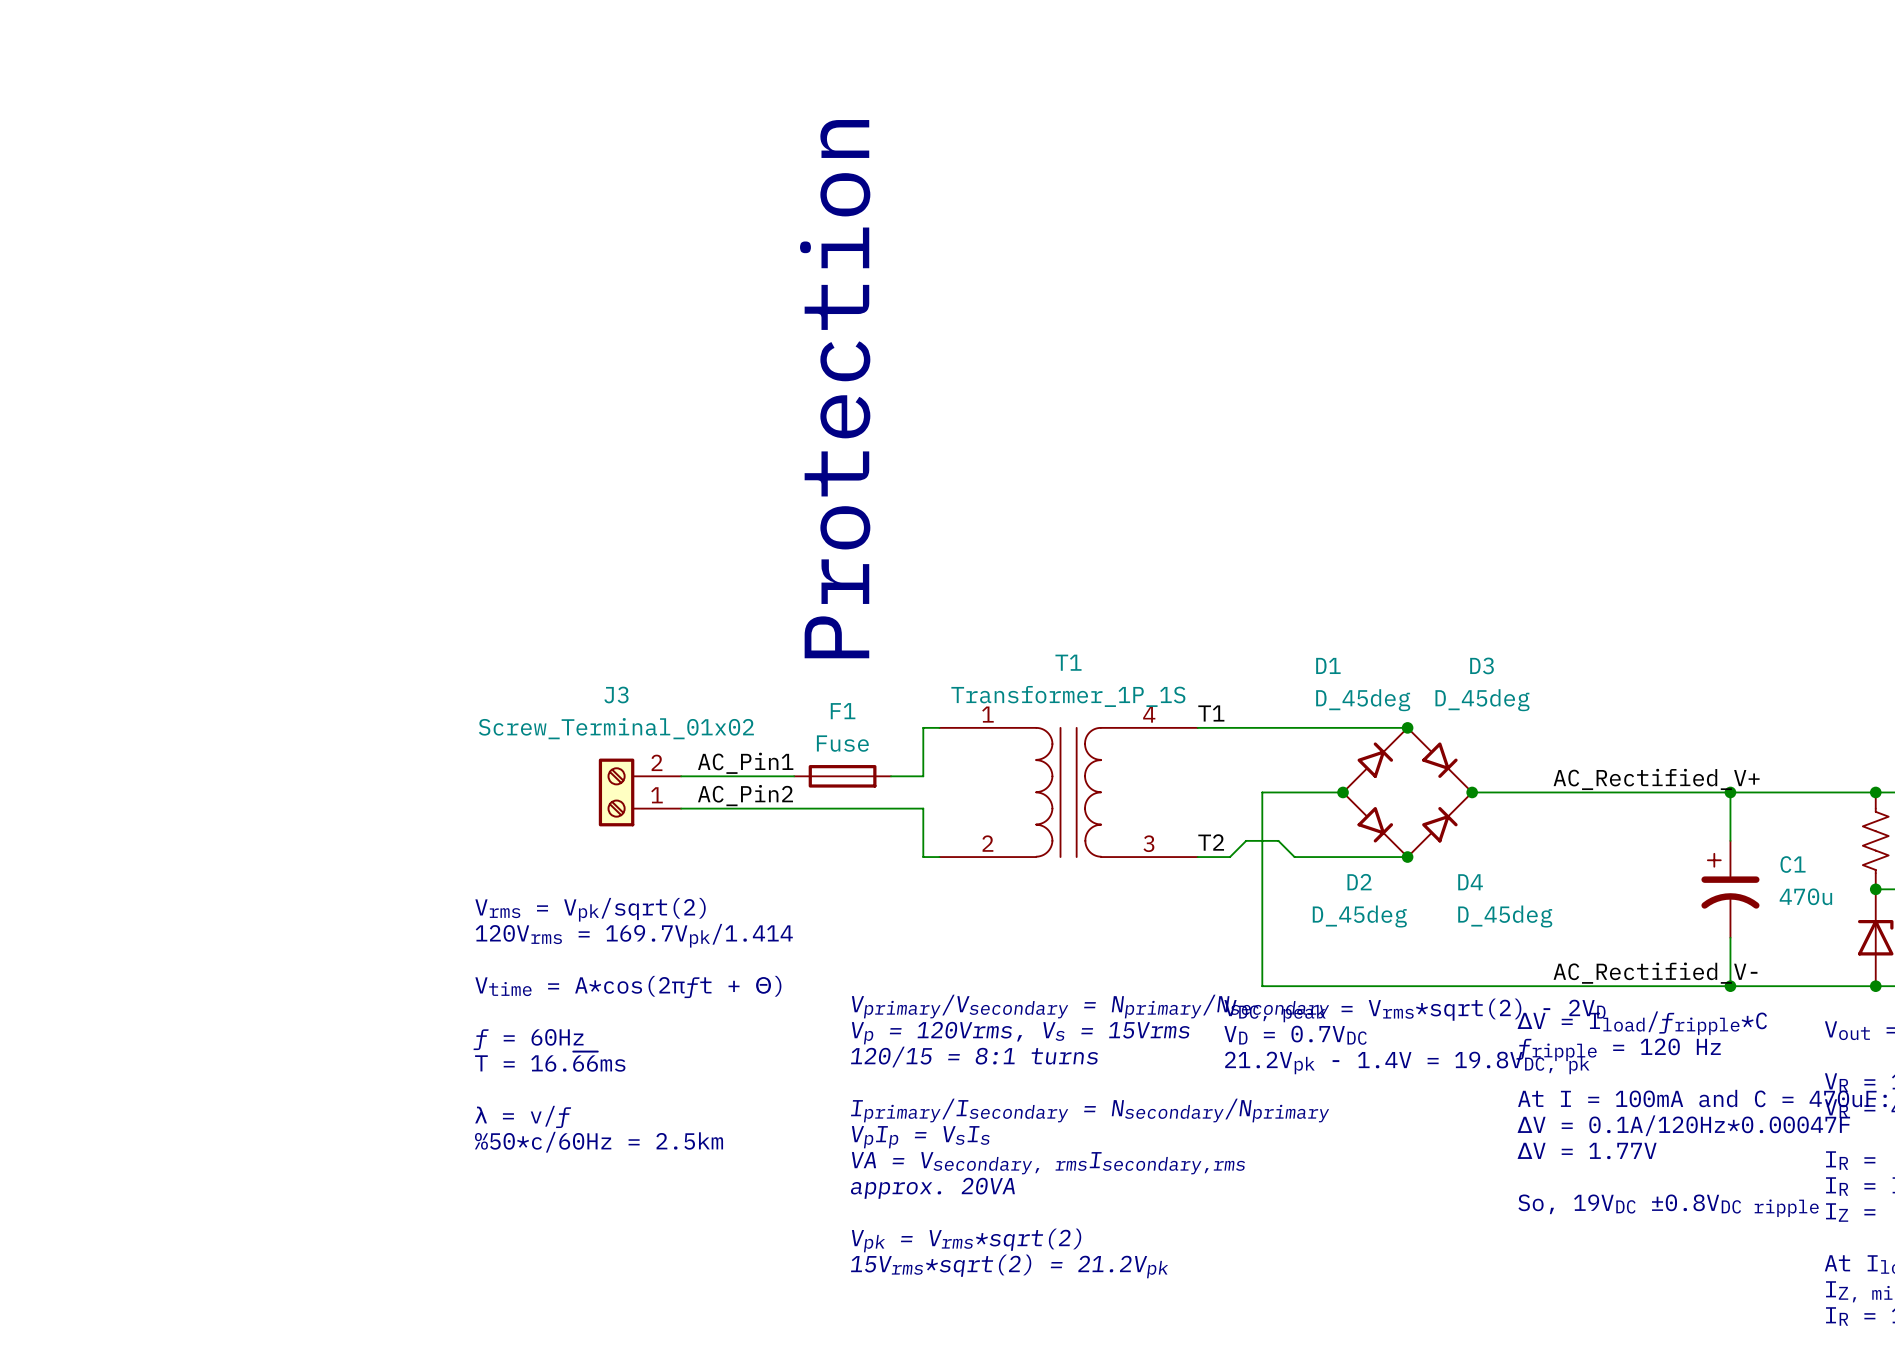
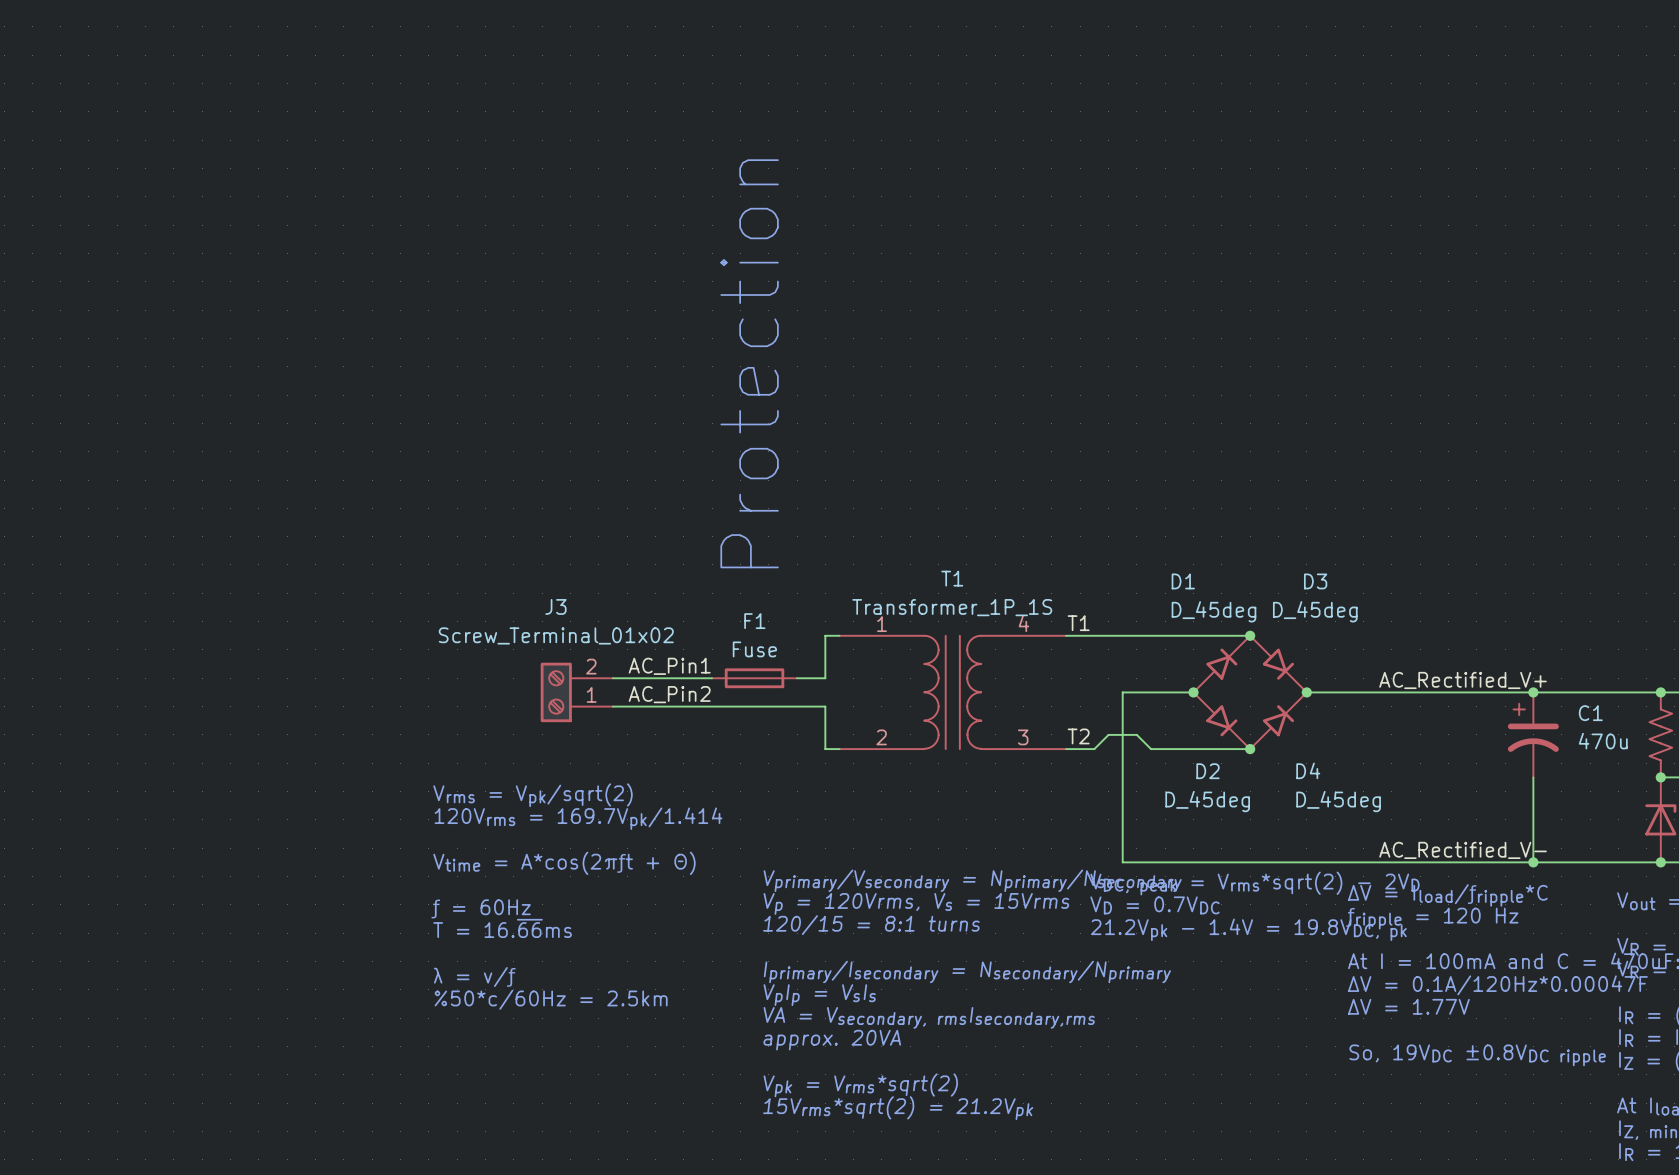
C1 position: (1730, 889) -> (1533, 734)

